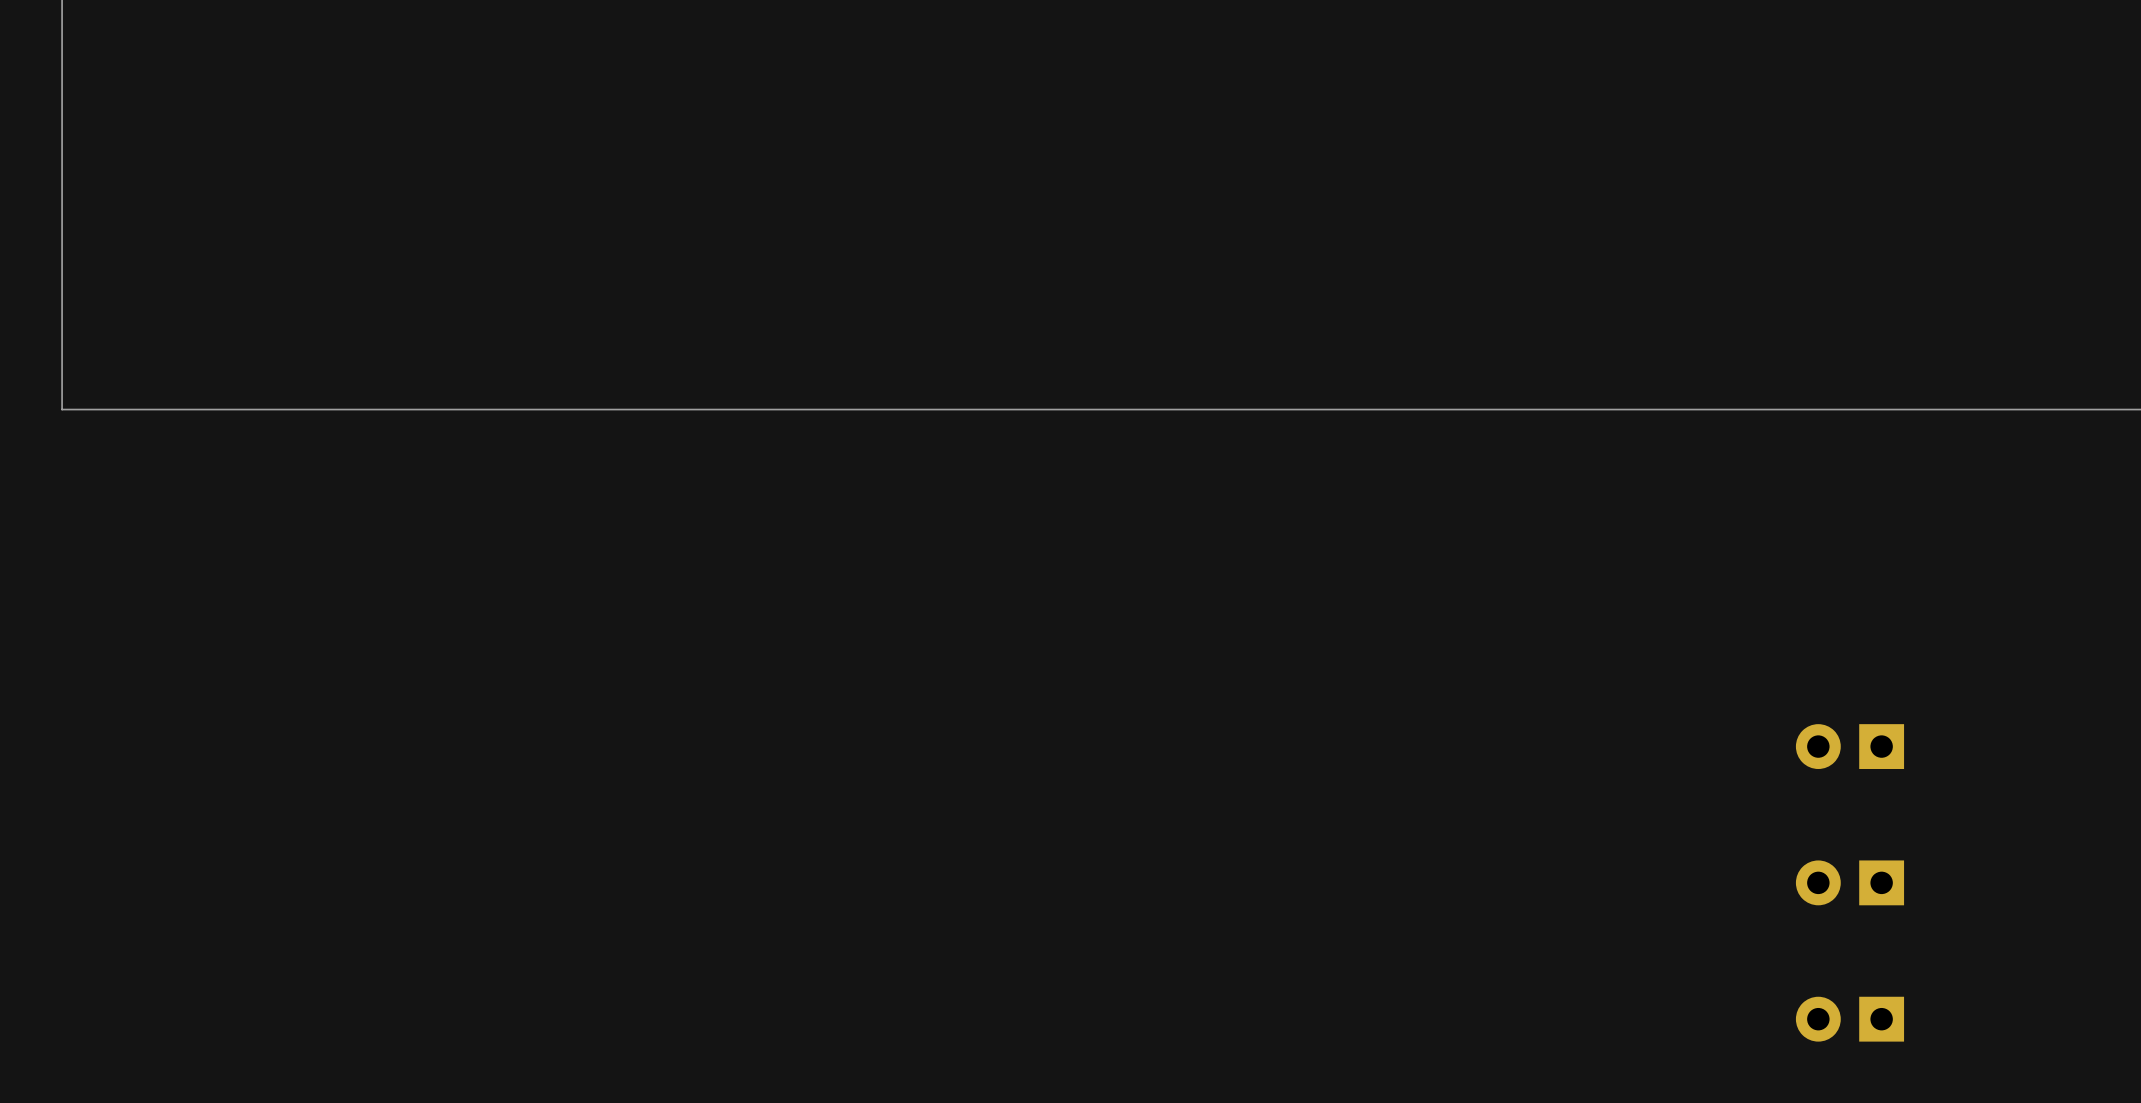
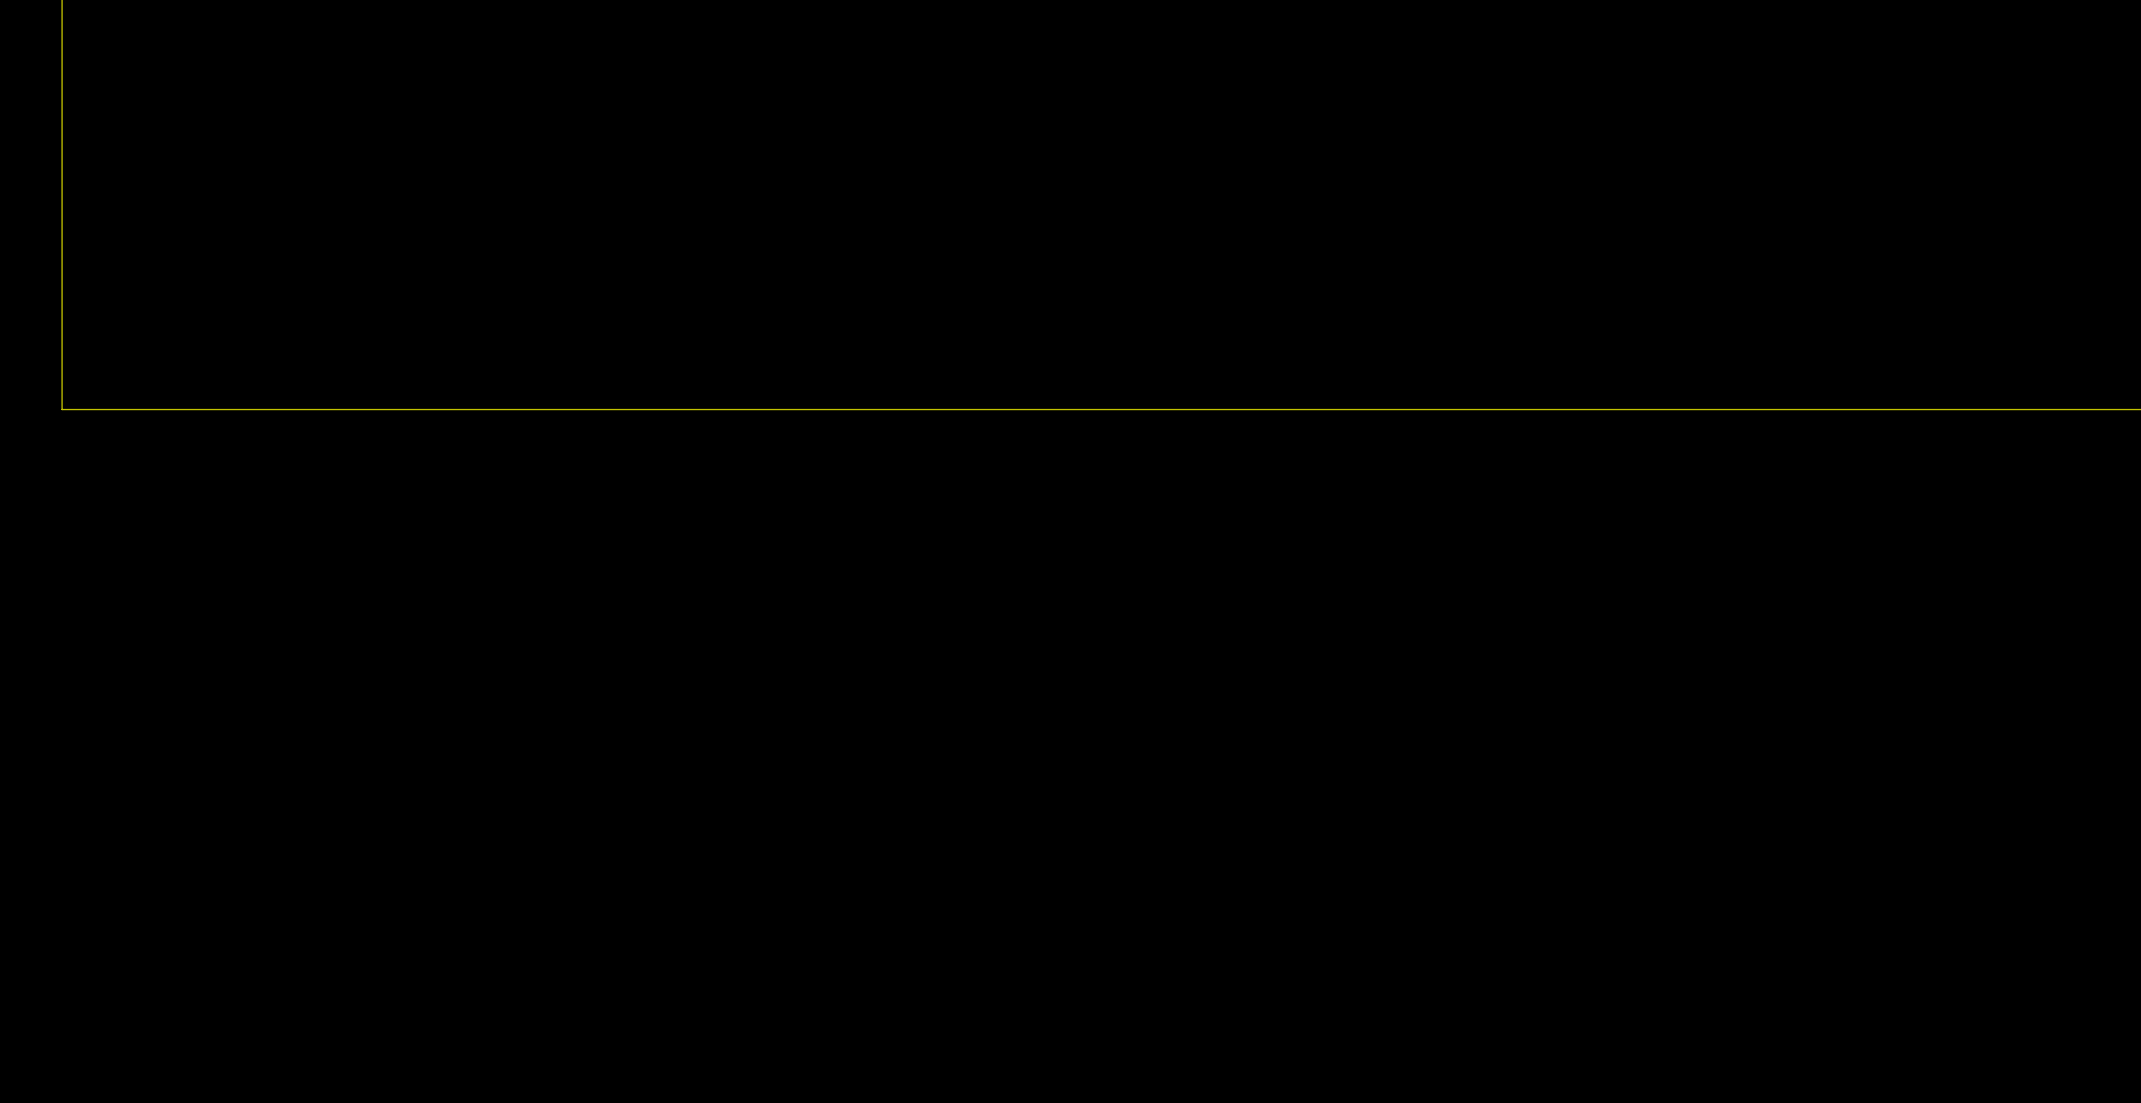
part: (1849, 746) -> none
part: (1849, 882) -> none
part: (1849, 1019) -> none

